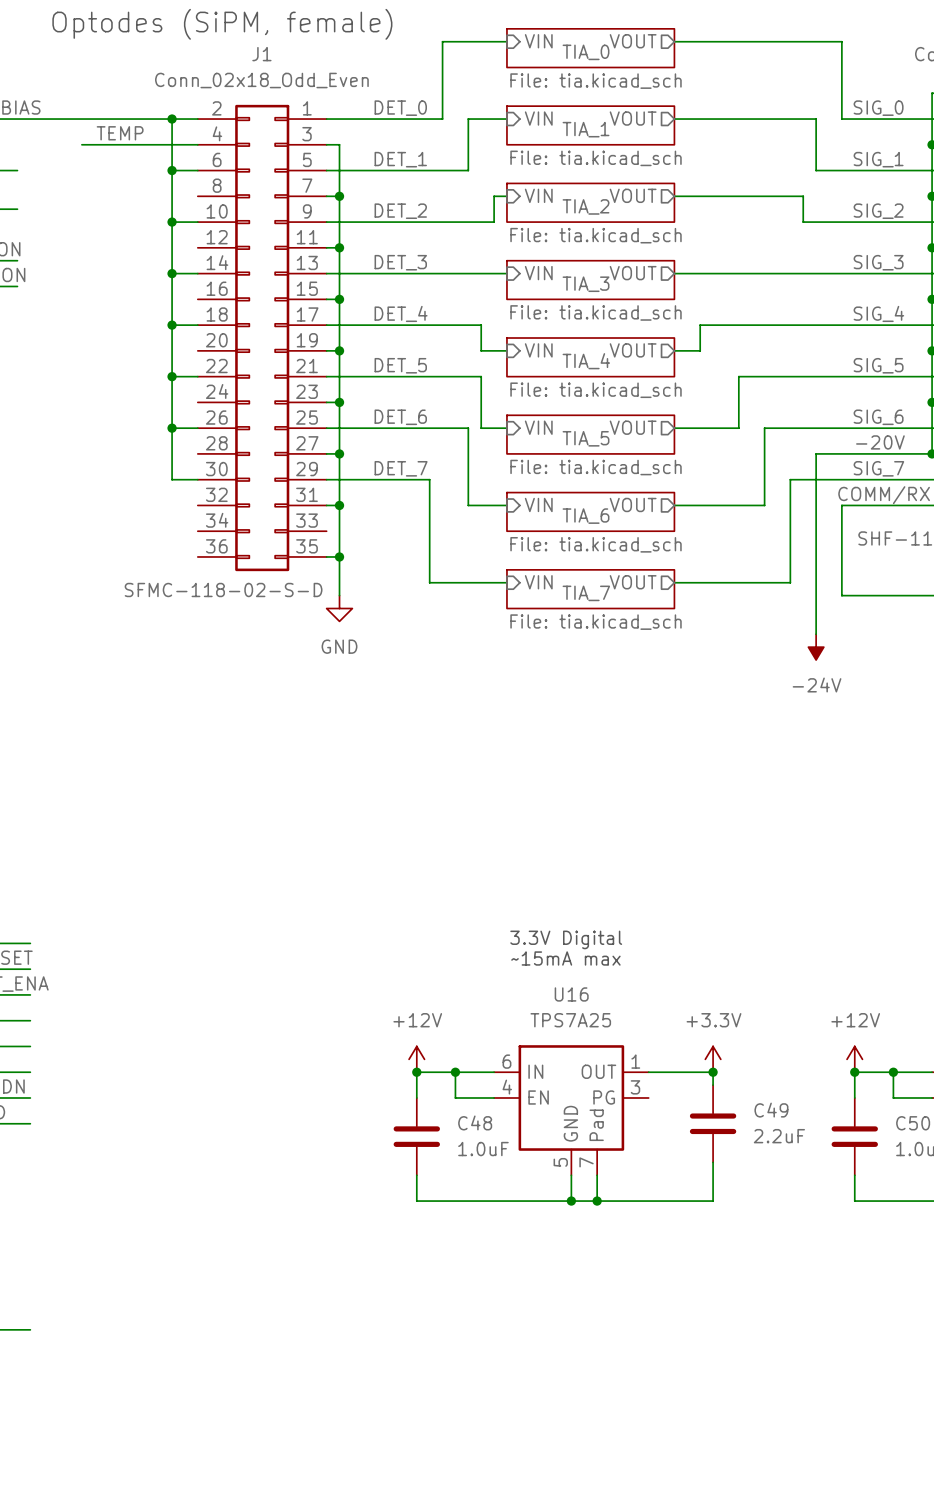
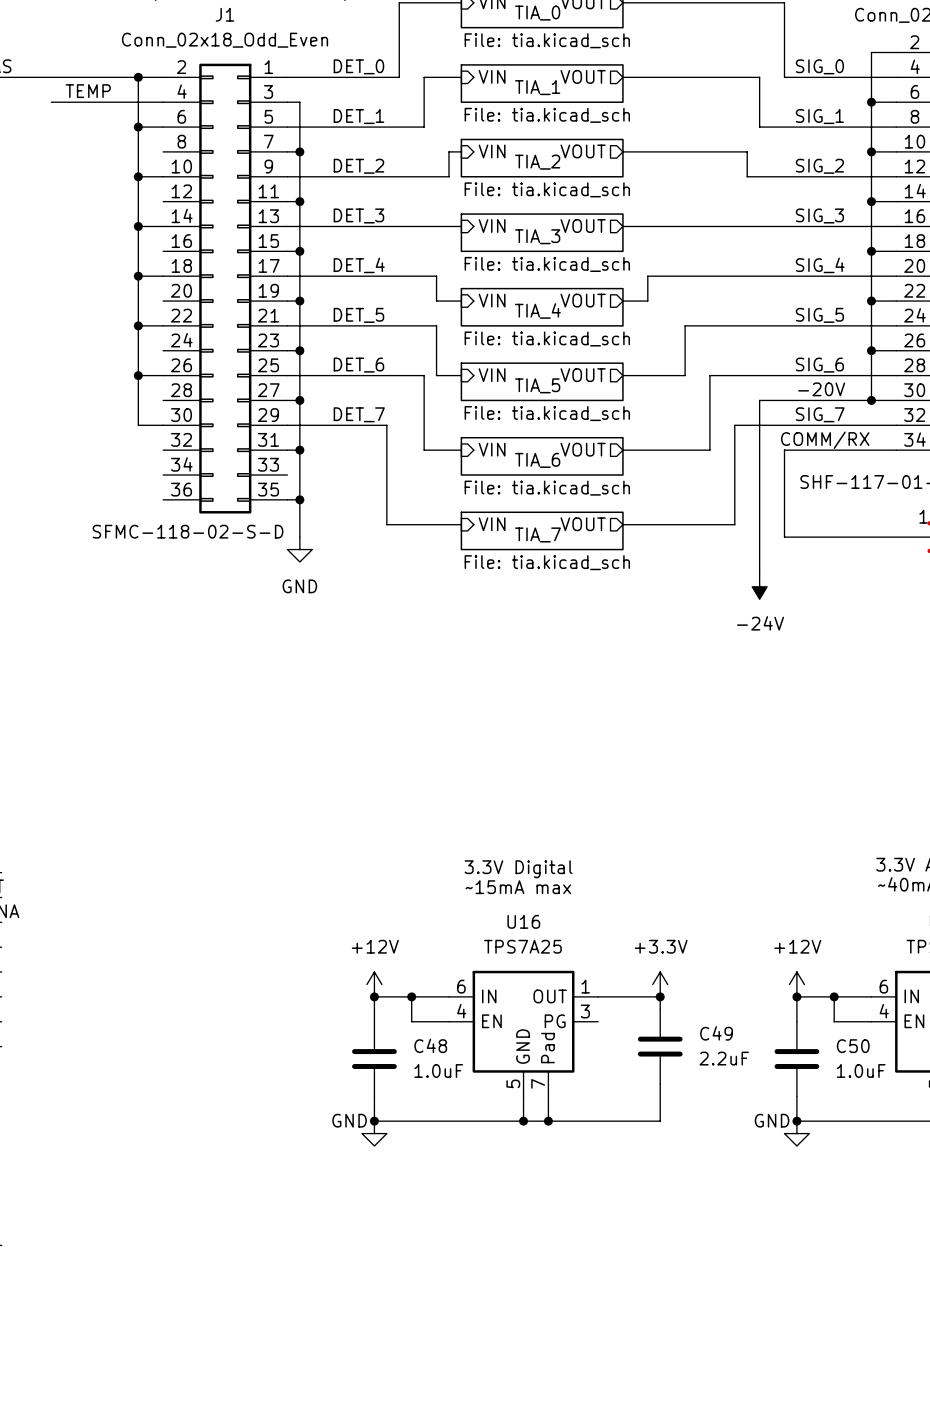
junction: none -> (374, 1121)
junction: none -> (796, 1121)
power symbol: none -> GND (374, 1133)
power symbol: none -> GND (796, 1133)

